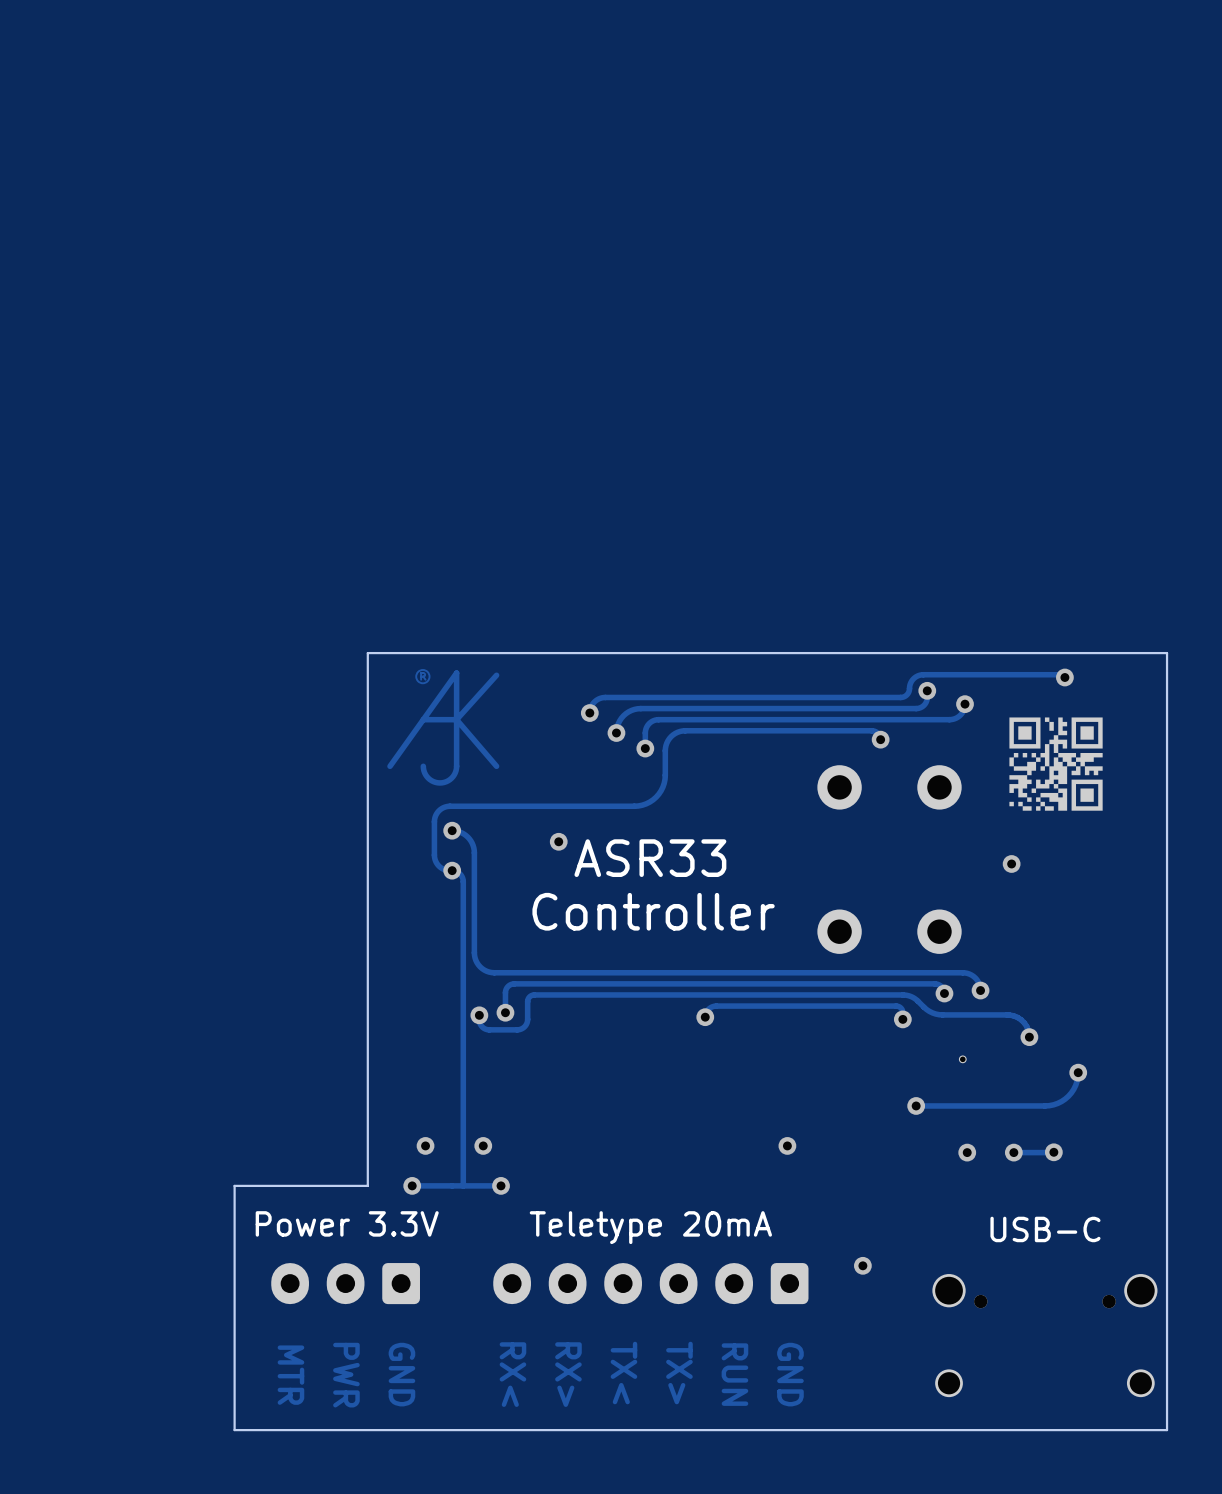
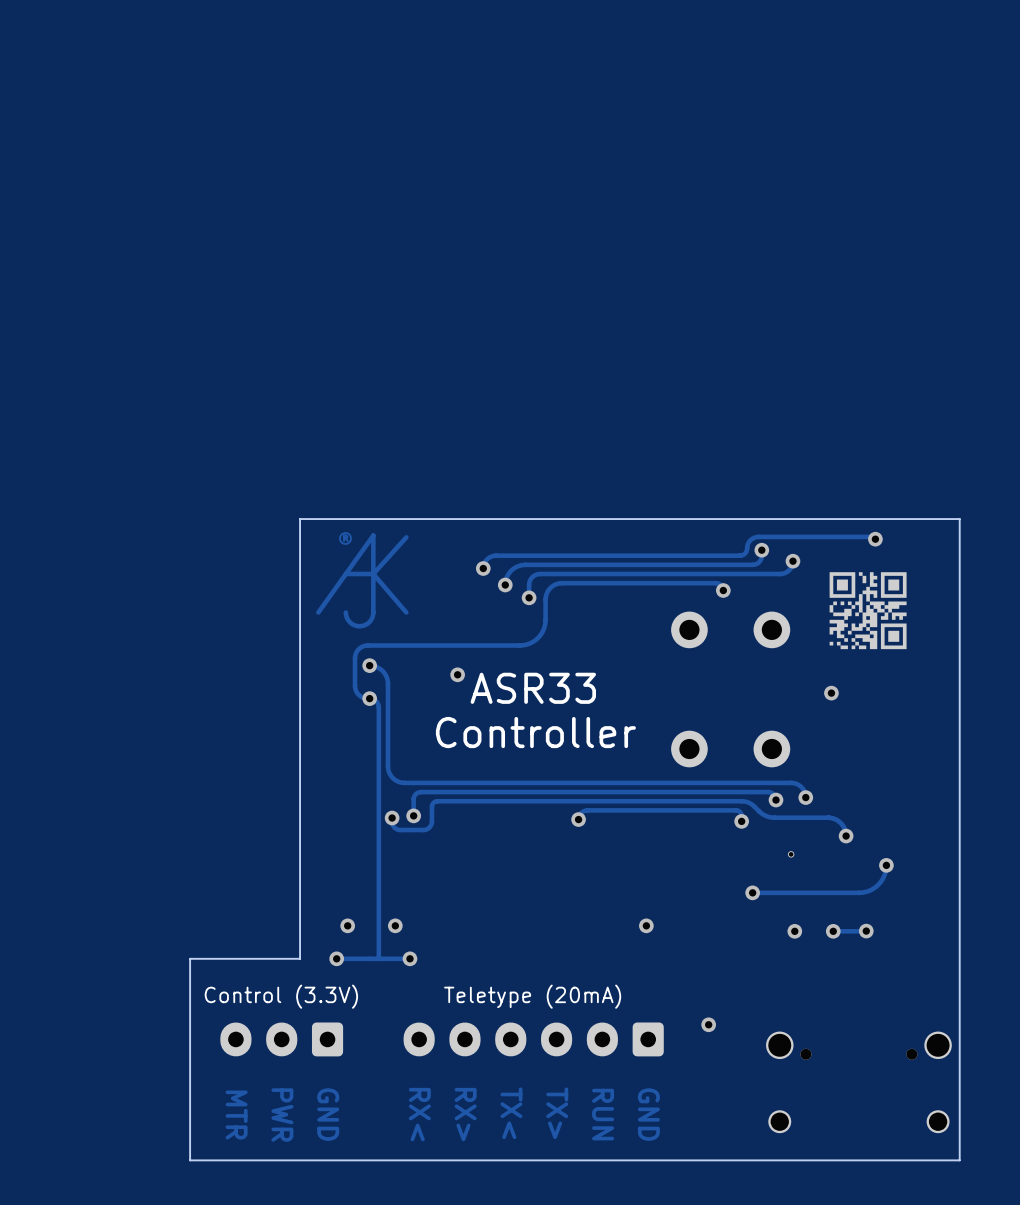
text: Power 3.3V (347, 1223) -> Control (3.3V) (281, 996)
text: Teletype 20mA (650, 1227) -> Teletype (20mA) (532, 996)
text: USB-C (1045, 1229) -> none

